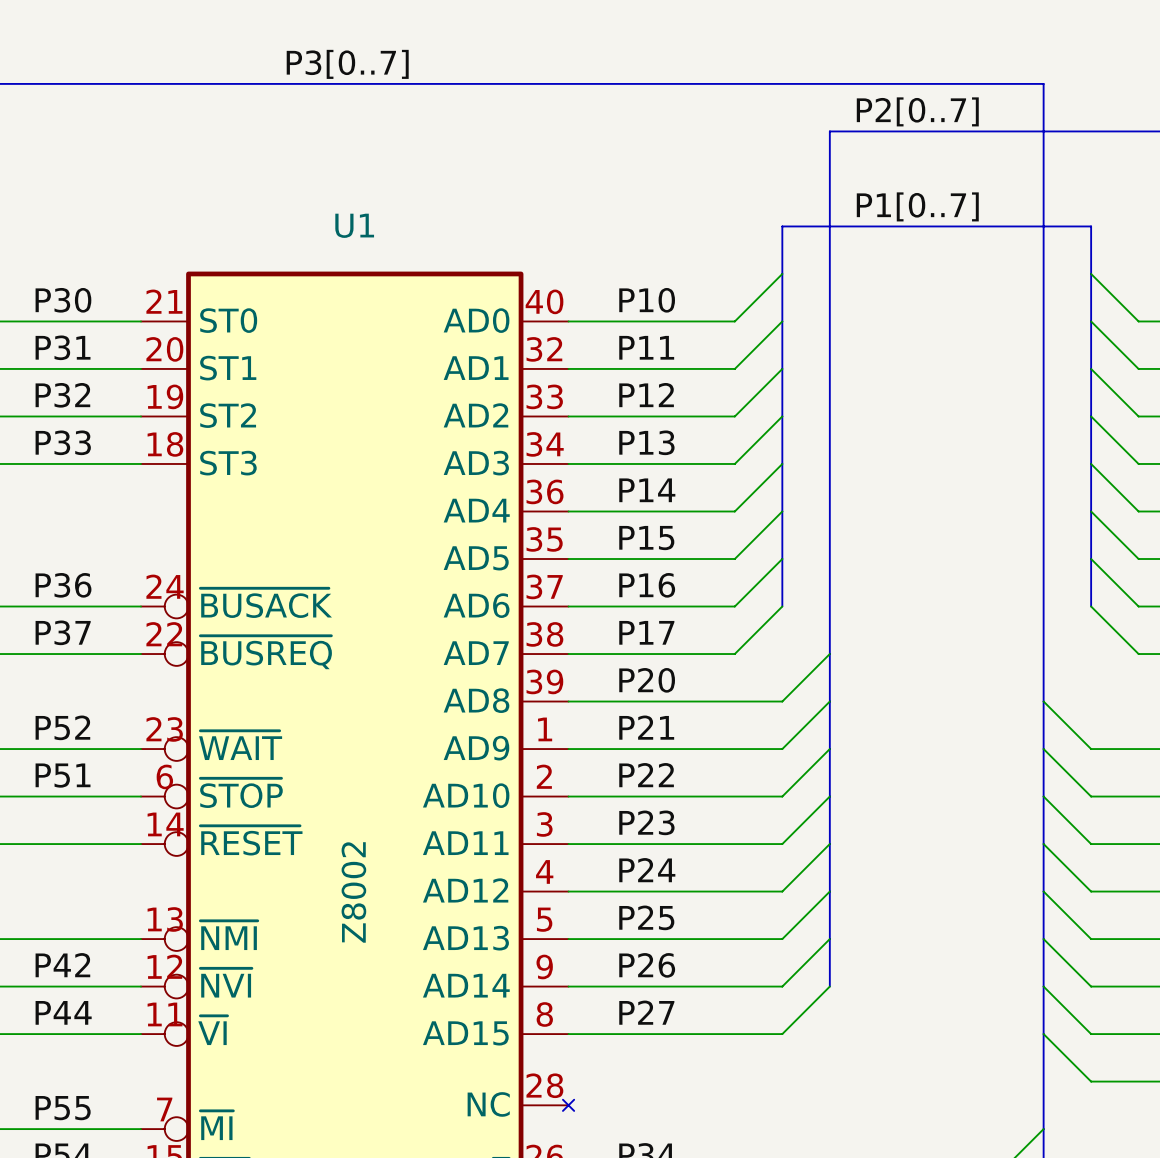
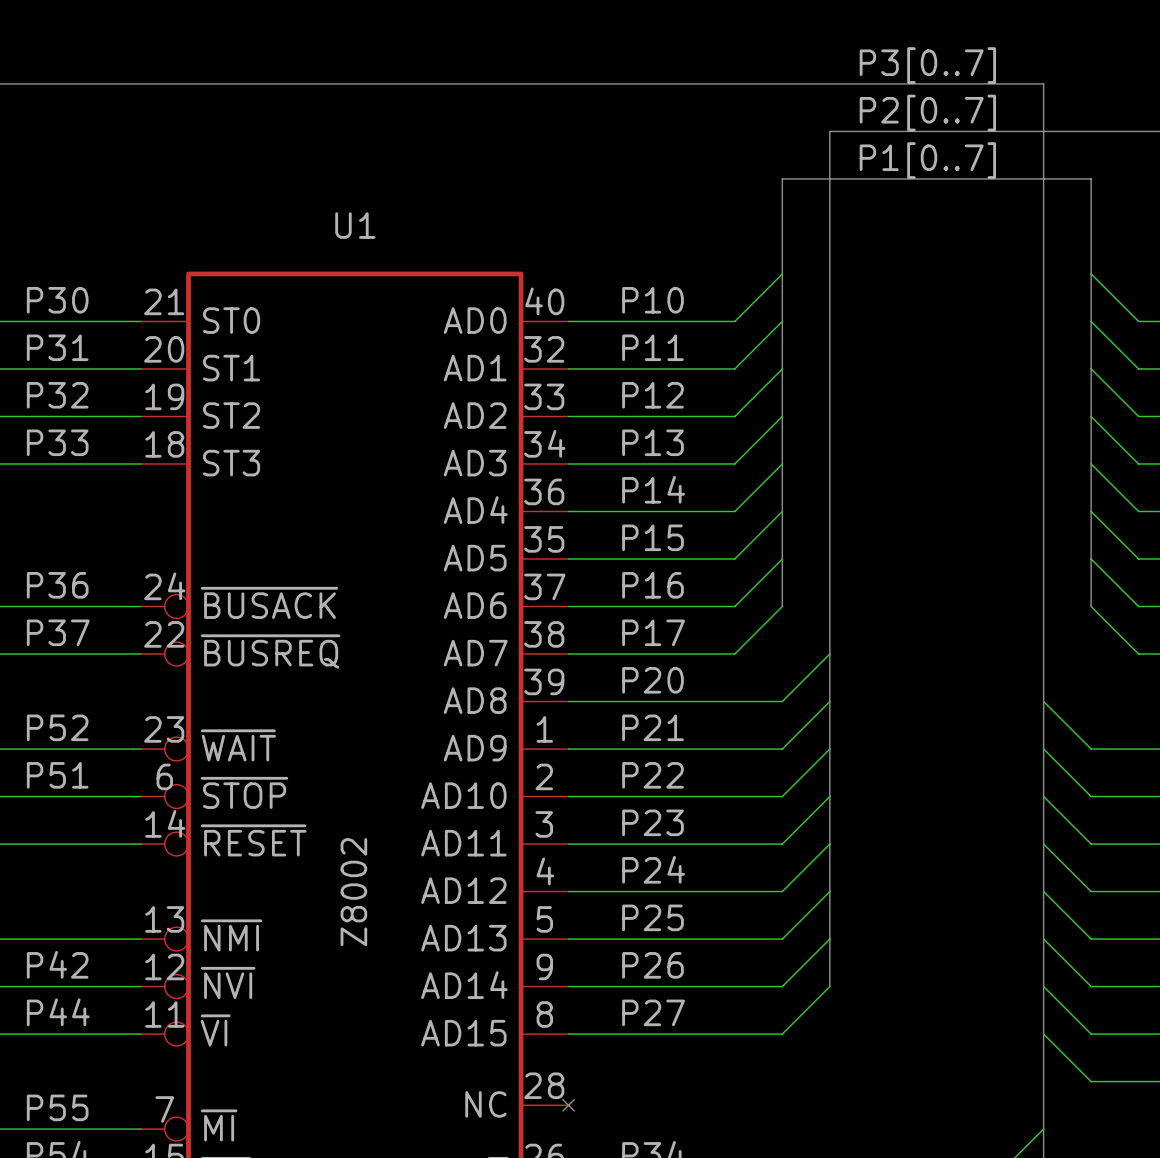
label: P3[0..7] (347, 64) -> none
label: none -> P3[0..7] (927, 65)
label position: P1[0..7] (917, 206) -> P1[0..7] (927, 160)
bus: (782, 226) (1091, 226) -> (782, 226) (782, 178) (1091, 178) (1091, 226)

